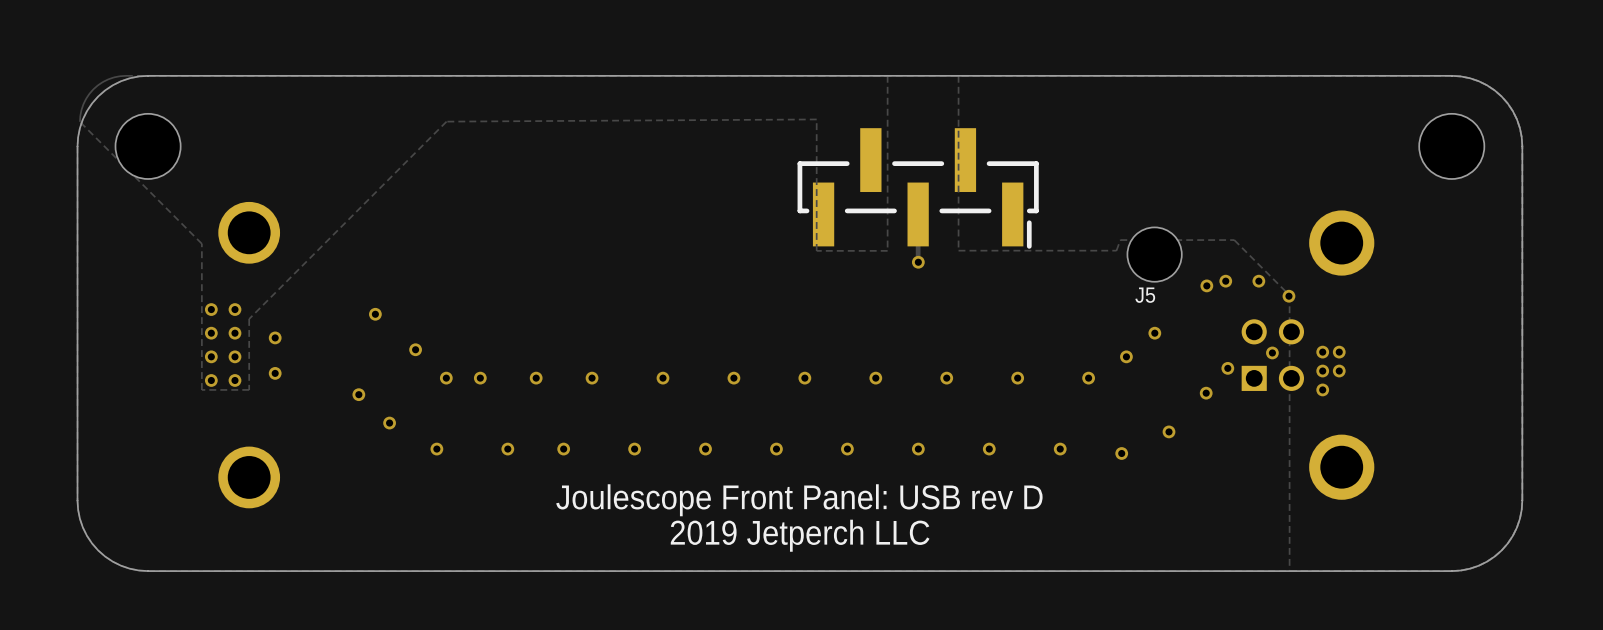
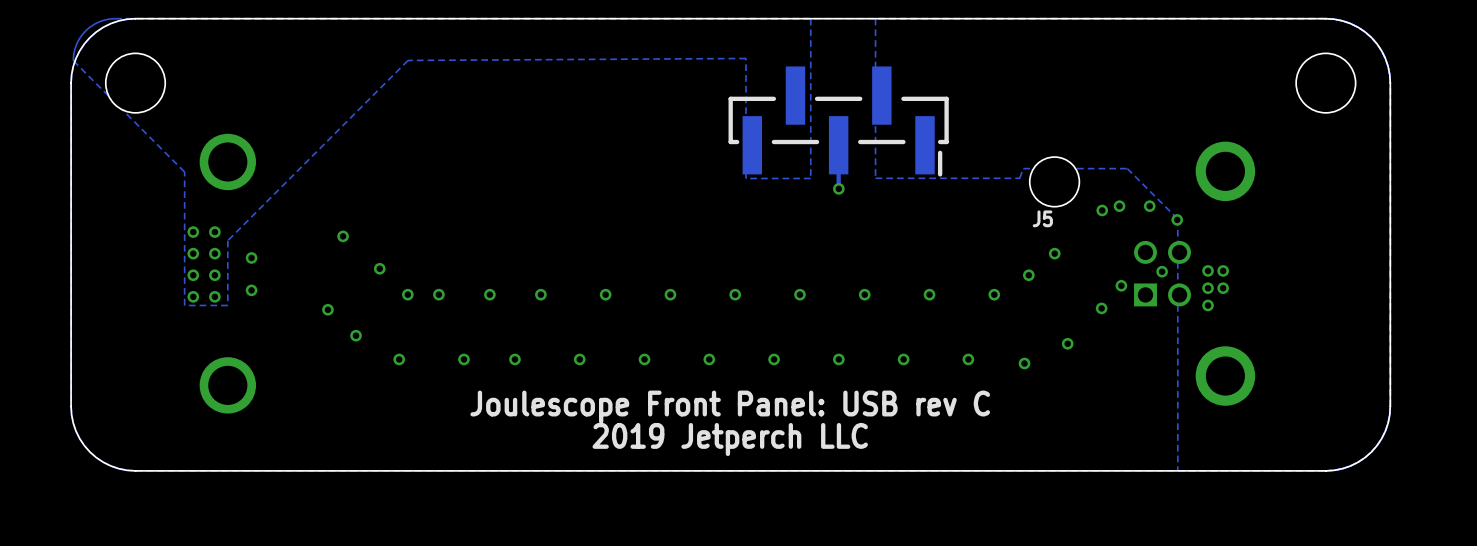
text: Joulescope Front Panel: USB rev D (799, 500) -> Joulescope Front Panel: USB rev C (730, 407)

